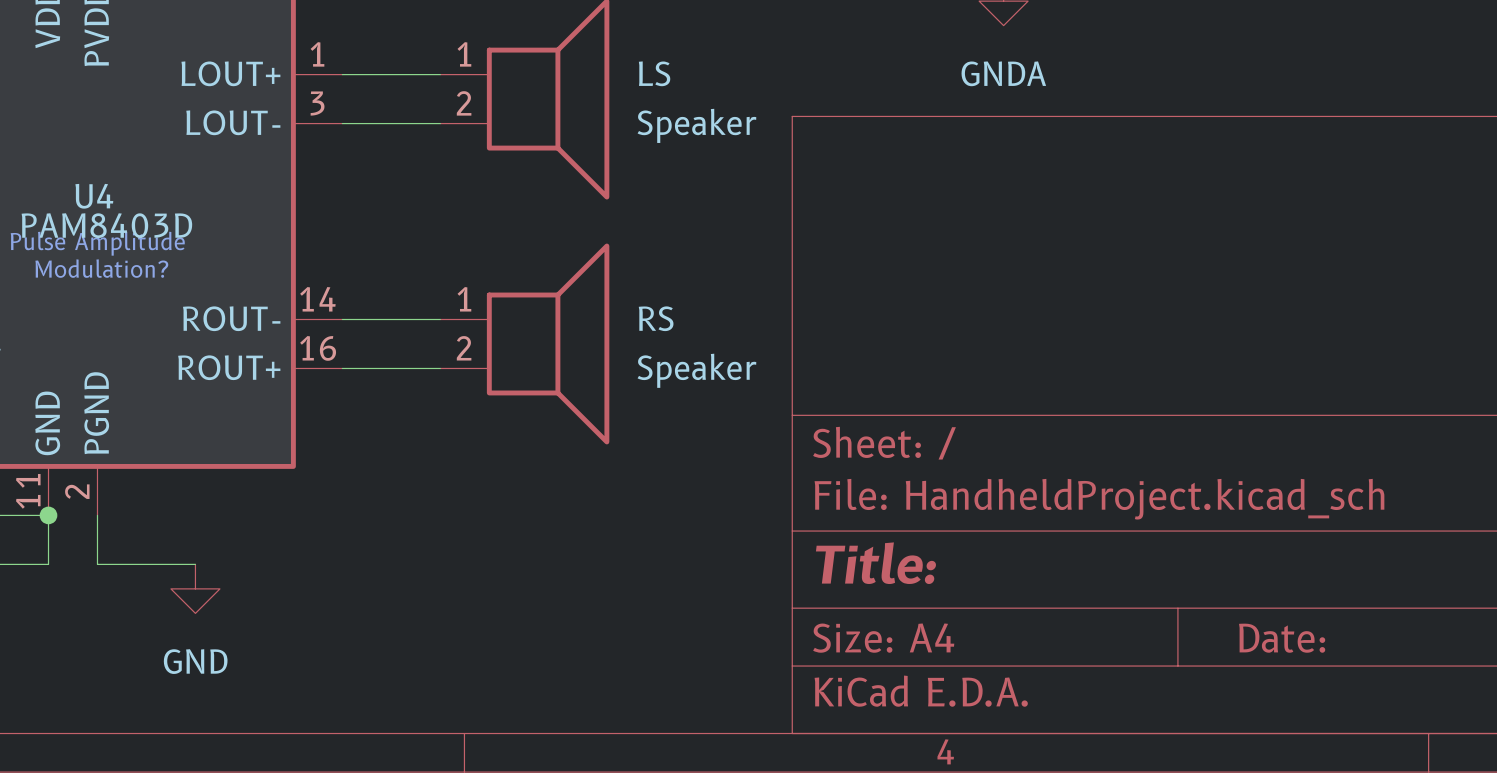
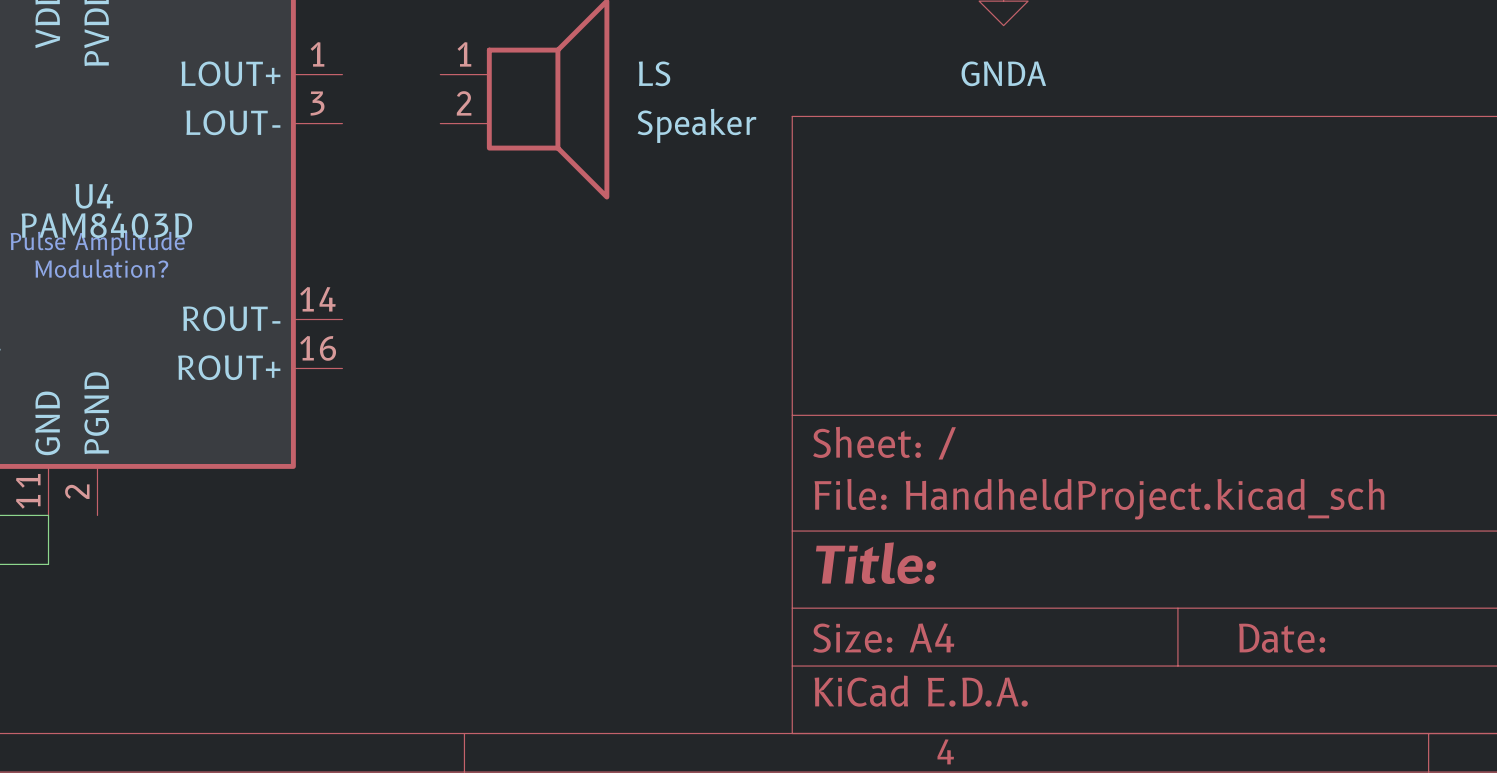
wire: (342, 74) (440, 74) -> none
wire: (342, 123) (440, 123) -> none
wire: (342, 319) (440, 319) -> none
RS: Speaker (524, 343) -> none
wire: (342, 368) (440, 368) -> none
junction: (48, 515) -> none
wire: (97, 515) (97, 564) (195, 564) -> none
power symbol: GND (195, 588) -> none

